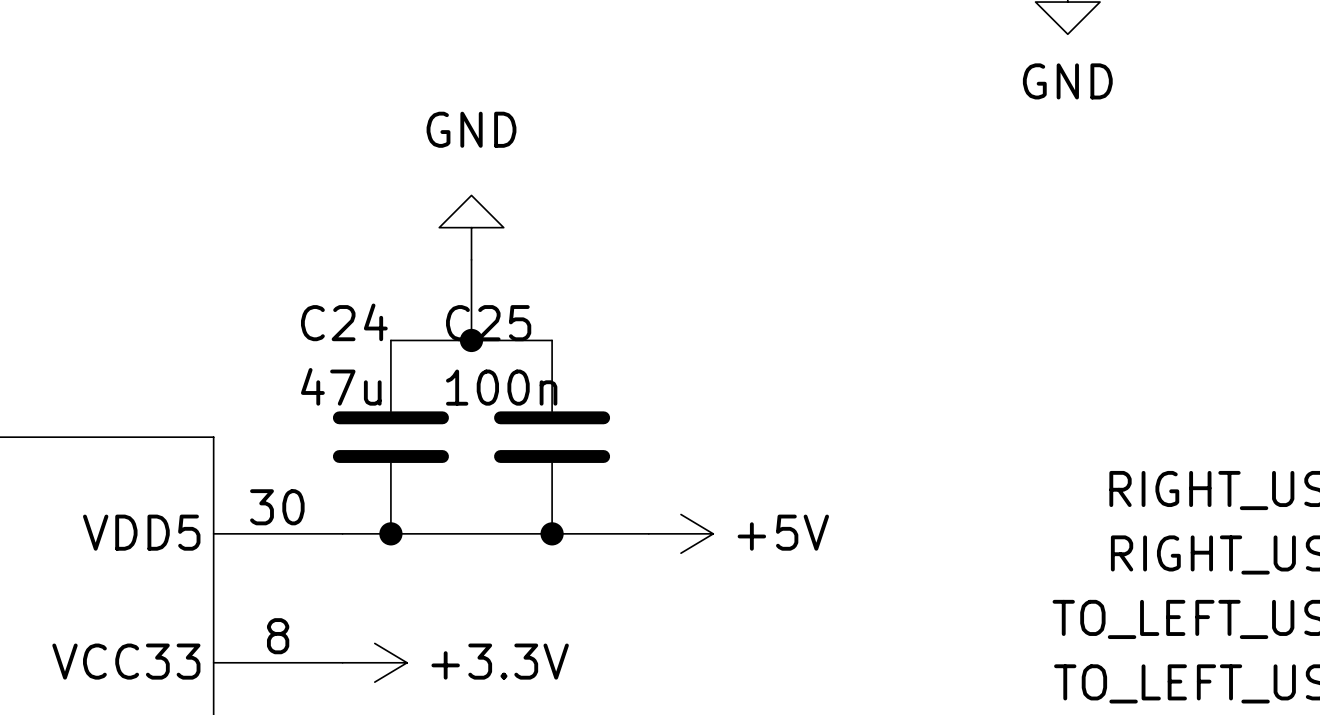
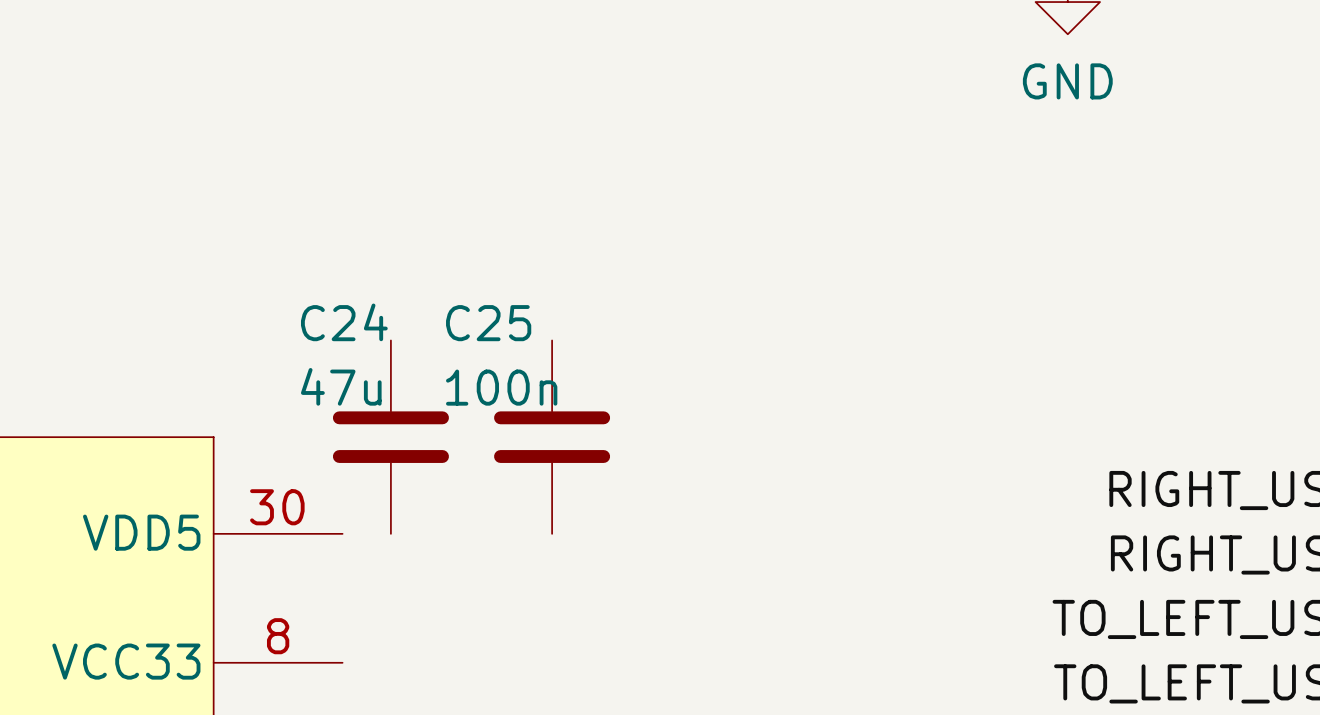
power symbol: GND (471, 227) -> none
wire: (471, 259) (471, 340) -> none
wire: (390, 340) (552, 340) -> none
junction: (471, 340) -> none
wire: (342, 533) (648, 533) -> none
junction: (390, 533) -> none
junction: (552, 533) -> none
power symbol: +5V (681, 533) -> none
power symbol: +3.3V (374, 662) -> none

